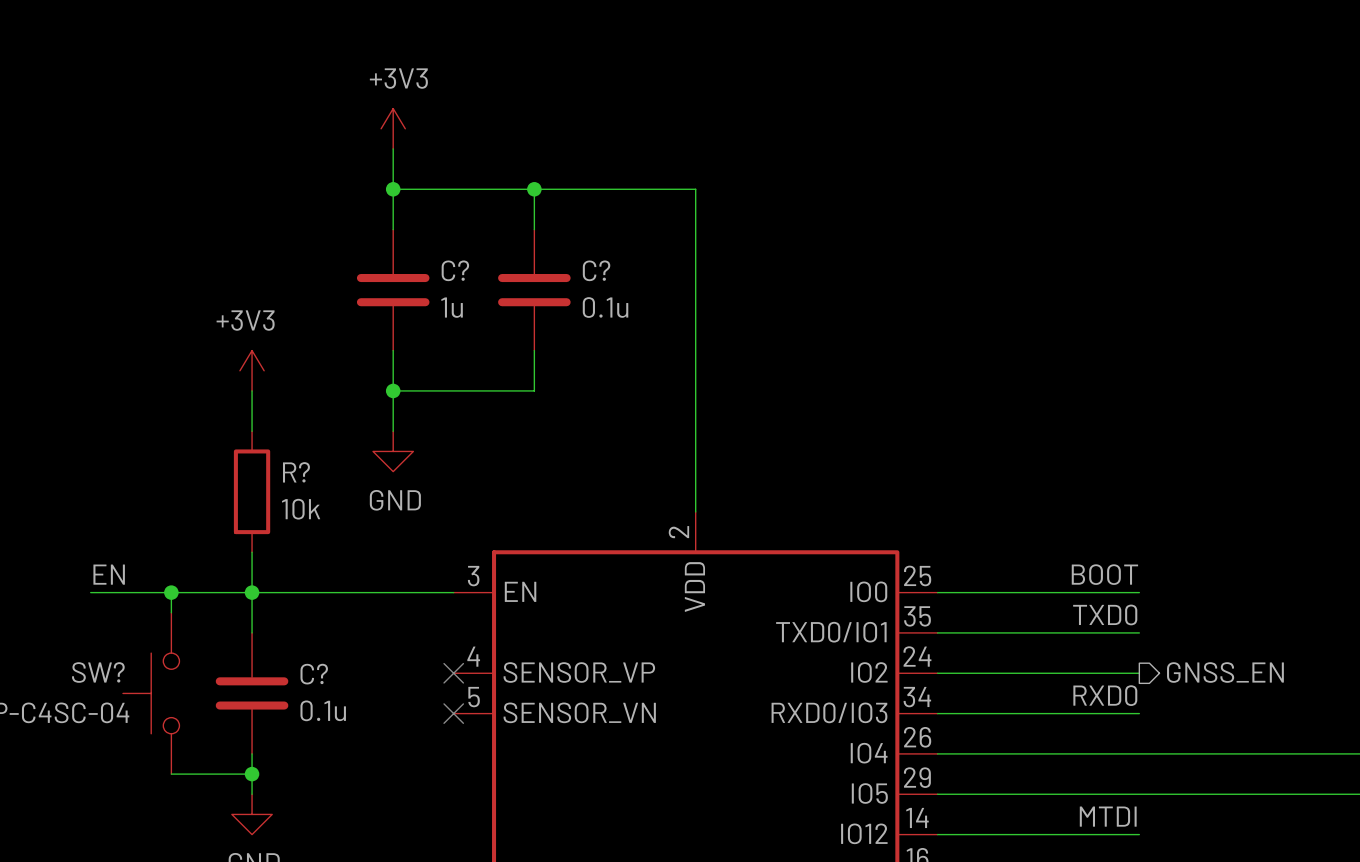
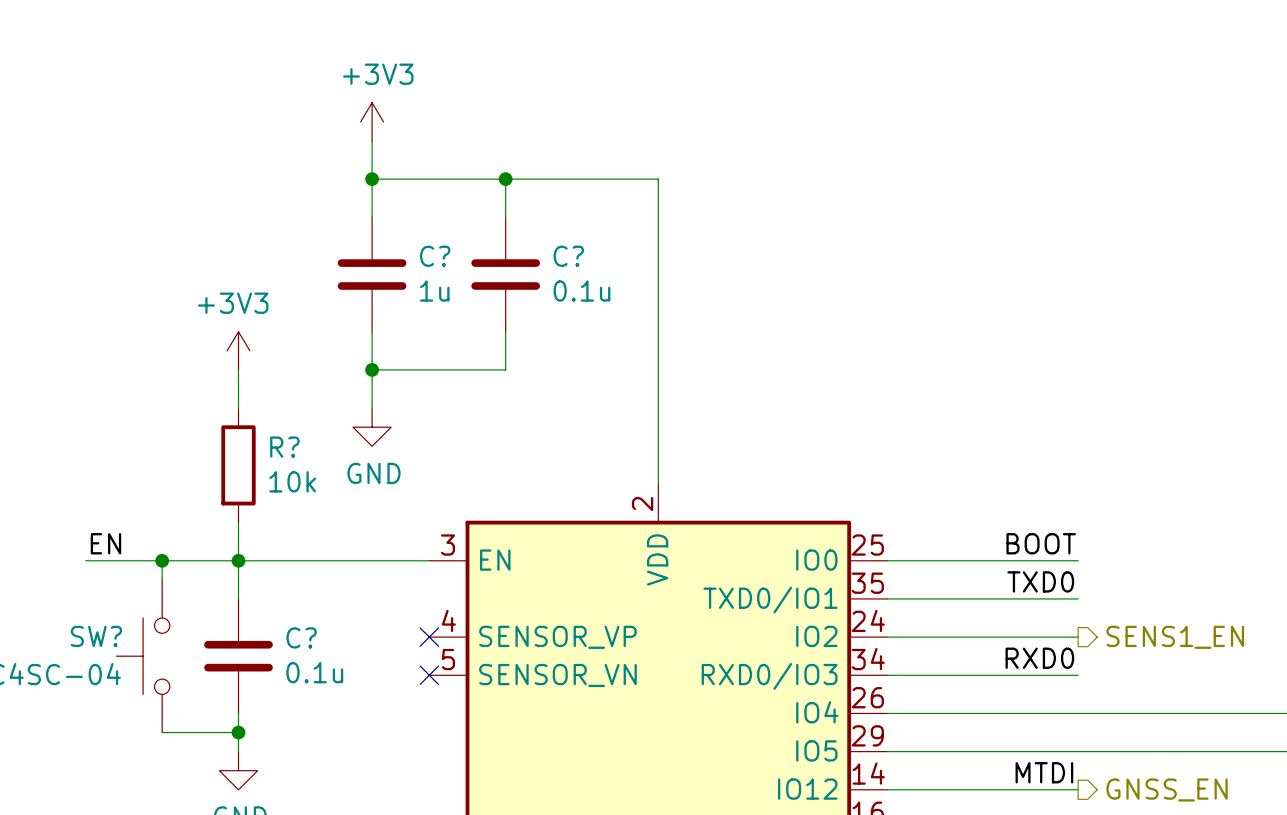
hierarchical label: GNSS_EN (1225, 672) -> SENS1_EN (1175, 637)
hierarchical label: none -> GNSS_EN (1167, 789)

